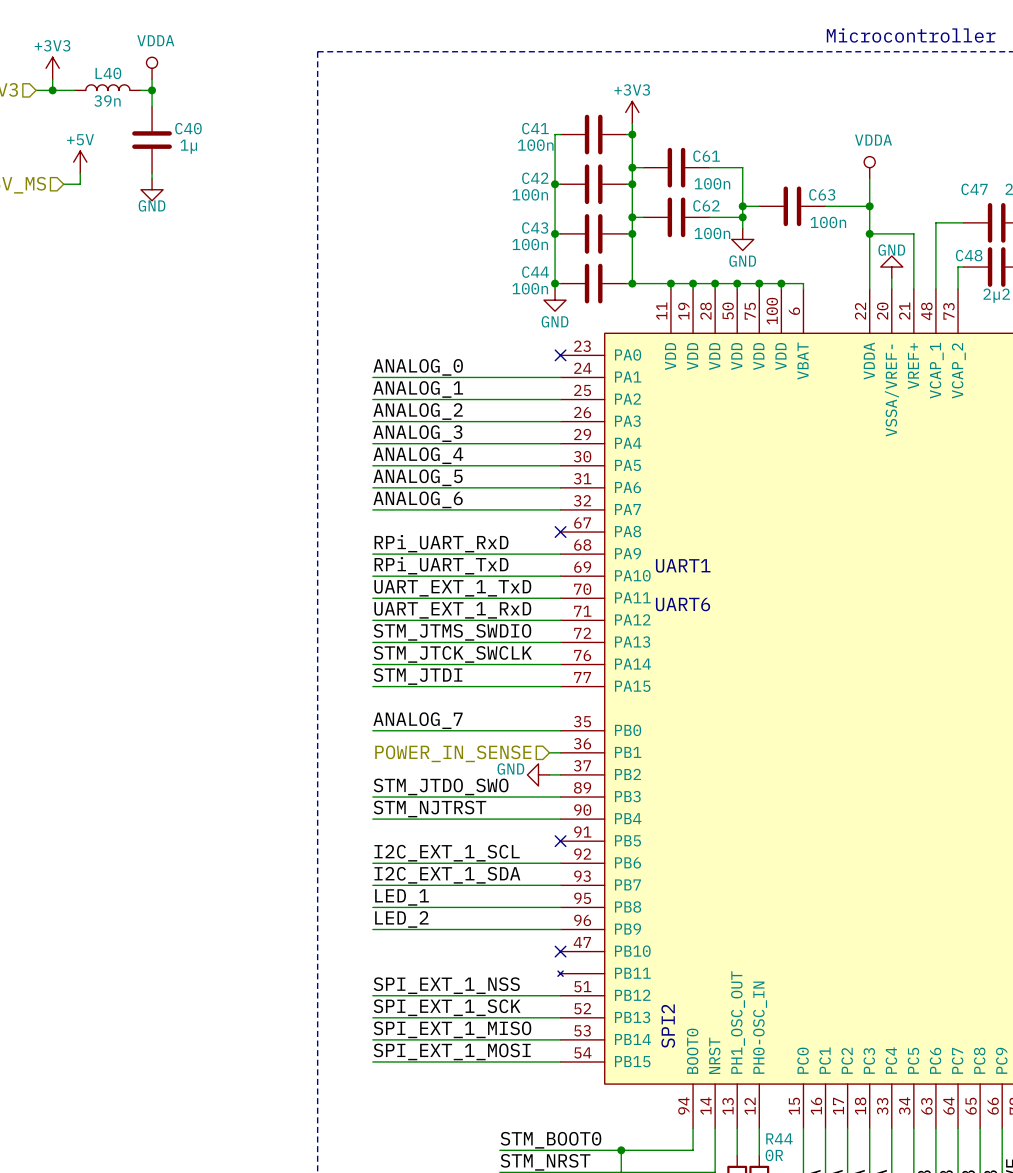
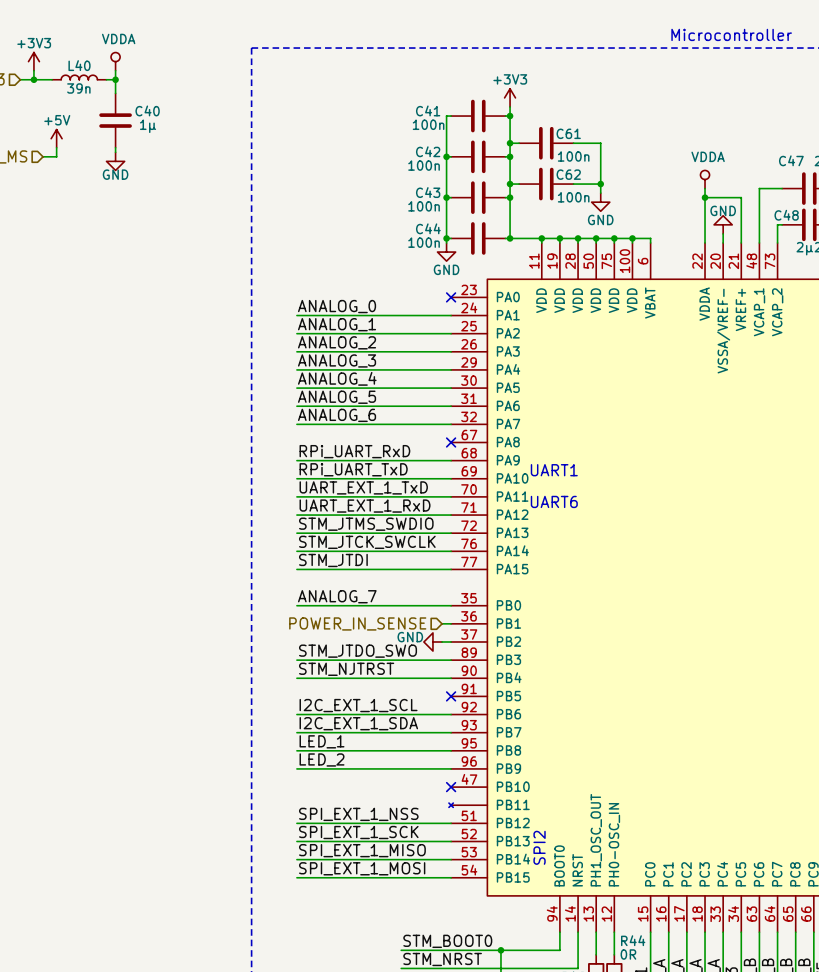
power symbol position: VDDA (869, 167) -> VDDA (705, 179)
wire: (869, 178) (869, 222) -> none
wire: (742, 206) (759, 206) -> none
junction: (742, 206) -> none
C63: 100n (792, 206) -> none
wire: (825, 206) (869, 206) -> none
junction: (869, 206) -> none

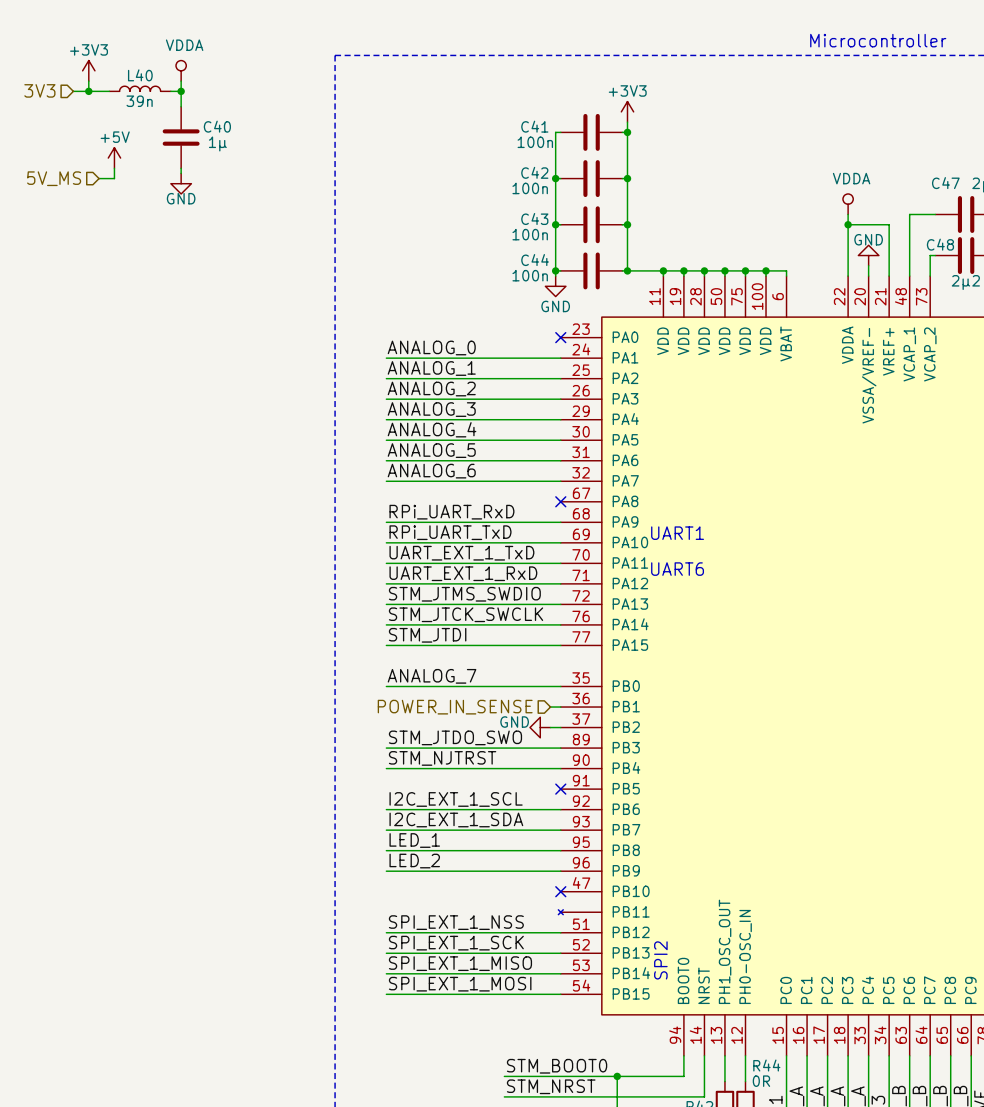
wire: (510, 143) (519, 143) -> none
junction: (510, 143) -> none
C61: 100n (546, 143) -> none
wire: (573, 143) (600, 143) (600, 193) -> none
wire: (510, 184) (519, 184) -> none
junction: (510, 184) -> none
C62: 100n (546, 184) -> none
wire: (573, 184) (600, 184) -> none
junction: (600, 184) -> none
power symbol: GND (600, 202) -> none

